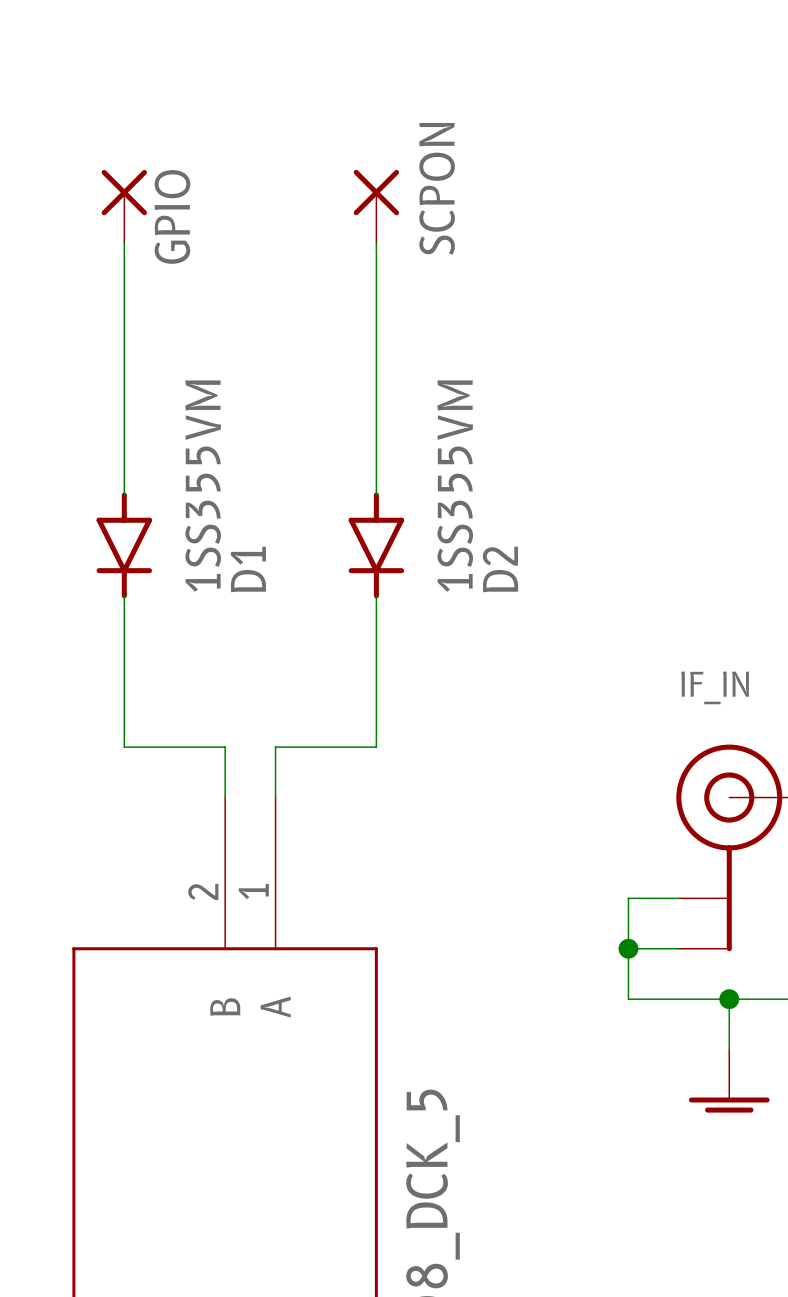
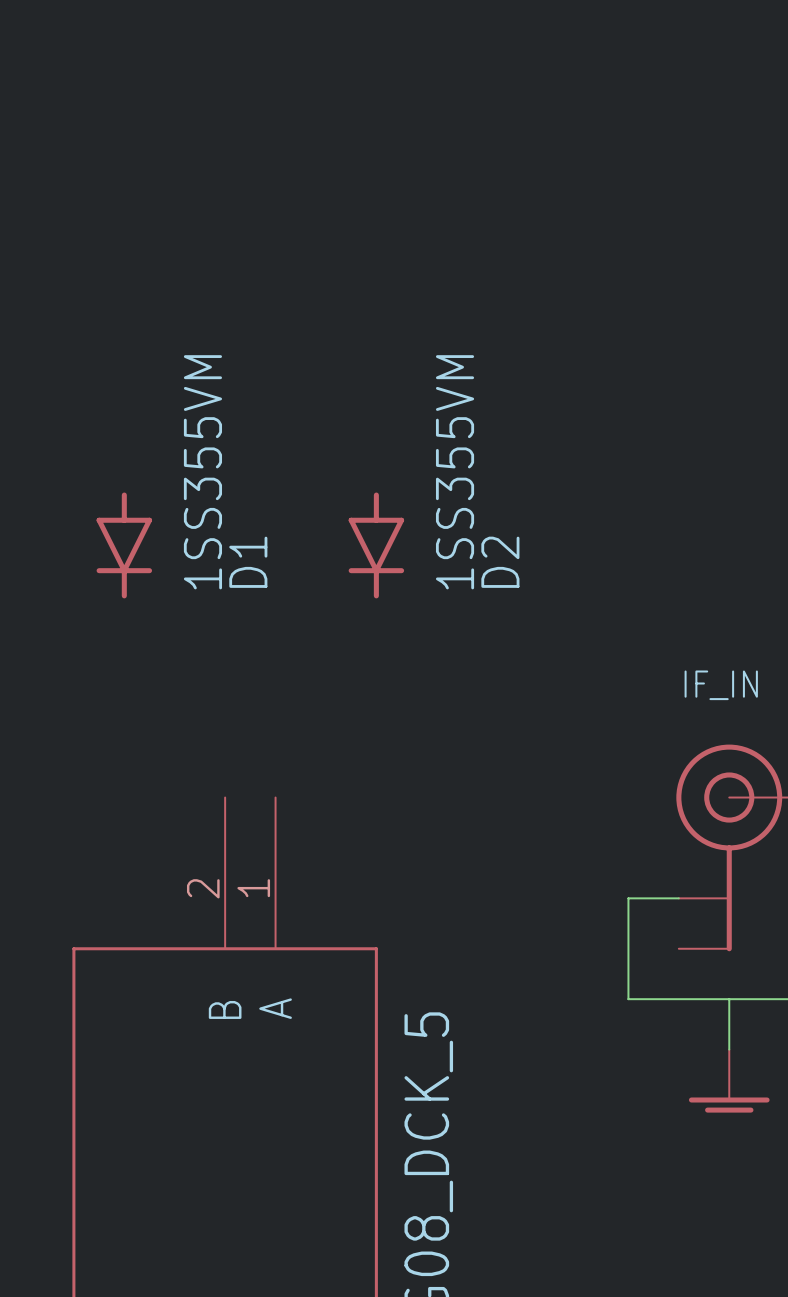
part: GPIO (124, 206) -> none
SCPON: (376, 206) -> none
wire: (124, 242) (124, 495) -> none
wire: (376, 242) (376, 495) -> none
wire: (124, 595) (124, 747) (225, 747) (225, 797) -> none
wire: (376, 595) (376, 747) (275, 747) (275, 797) -> none
wire: (628, 948) (678, 948) -> none
junction: (628, 948) -> none
junction: (729, 999) -> none

